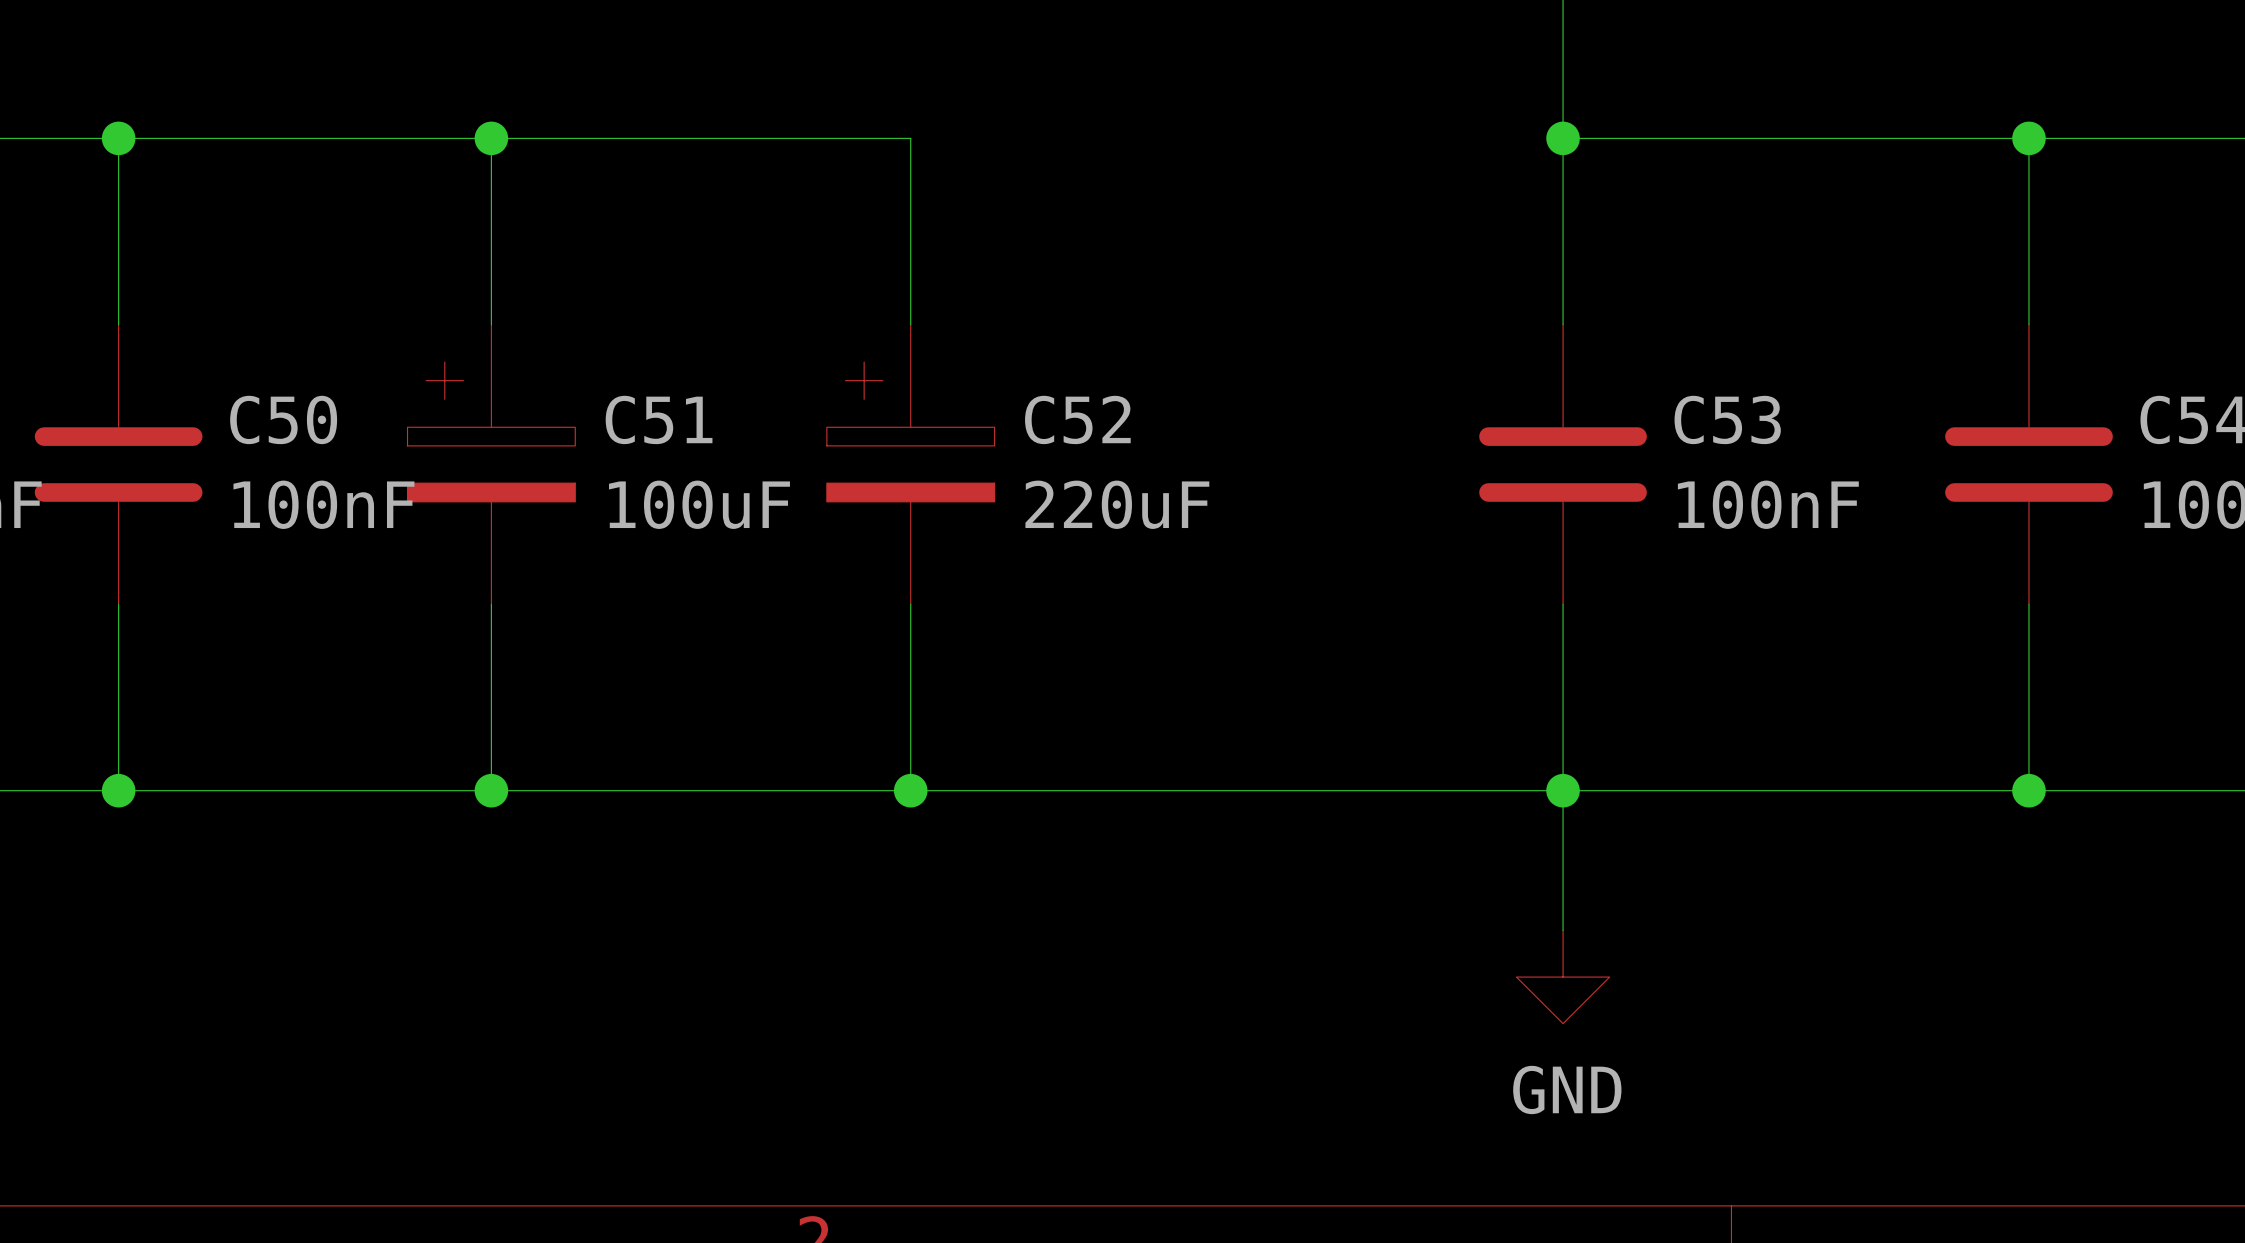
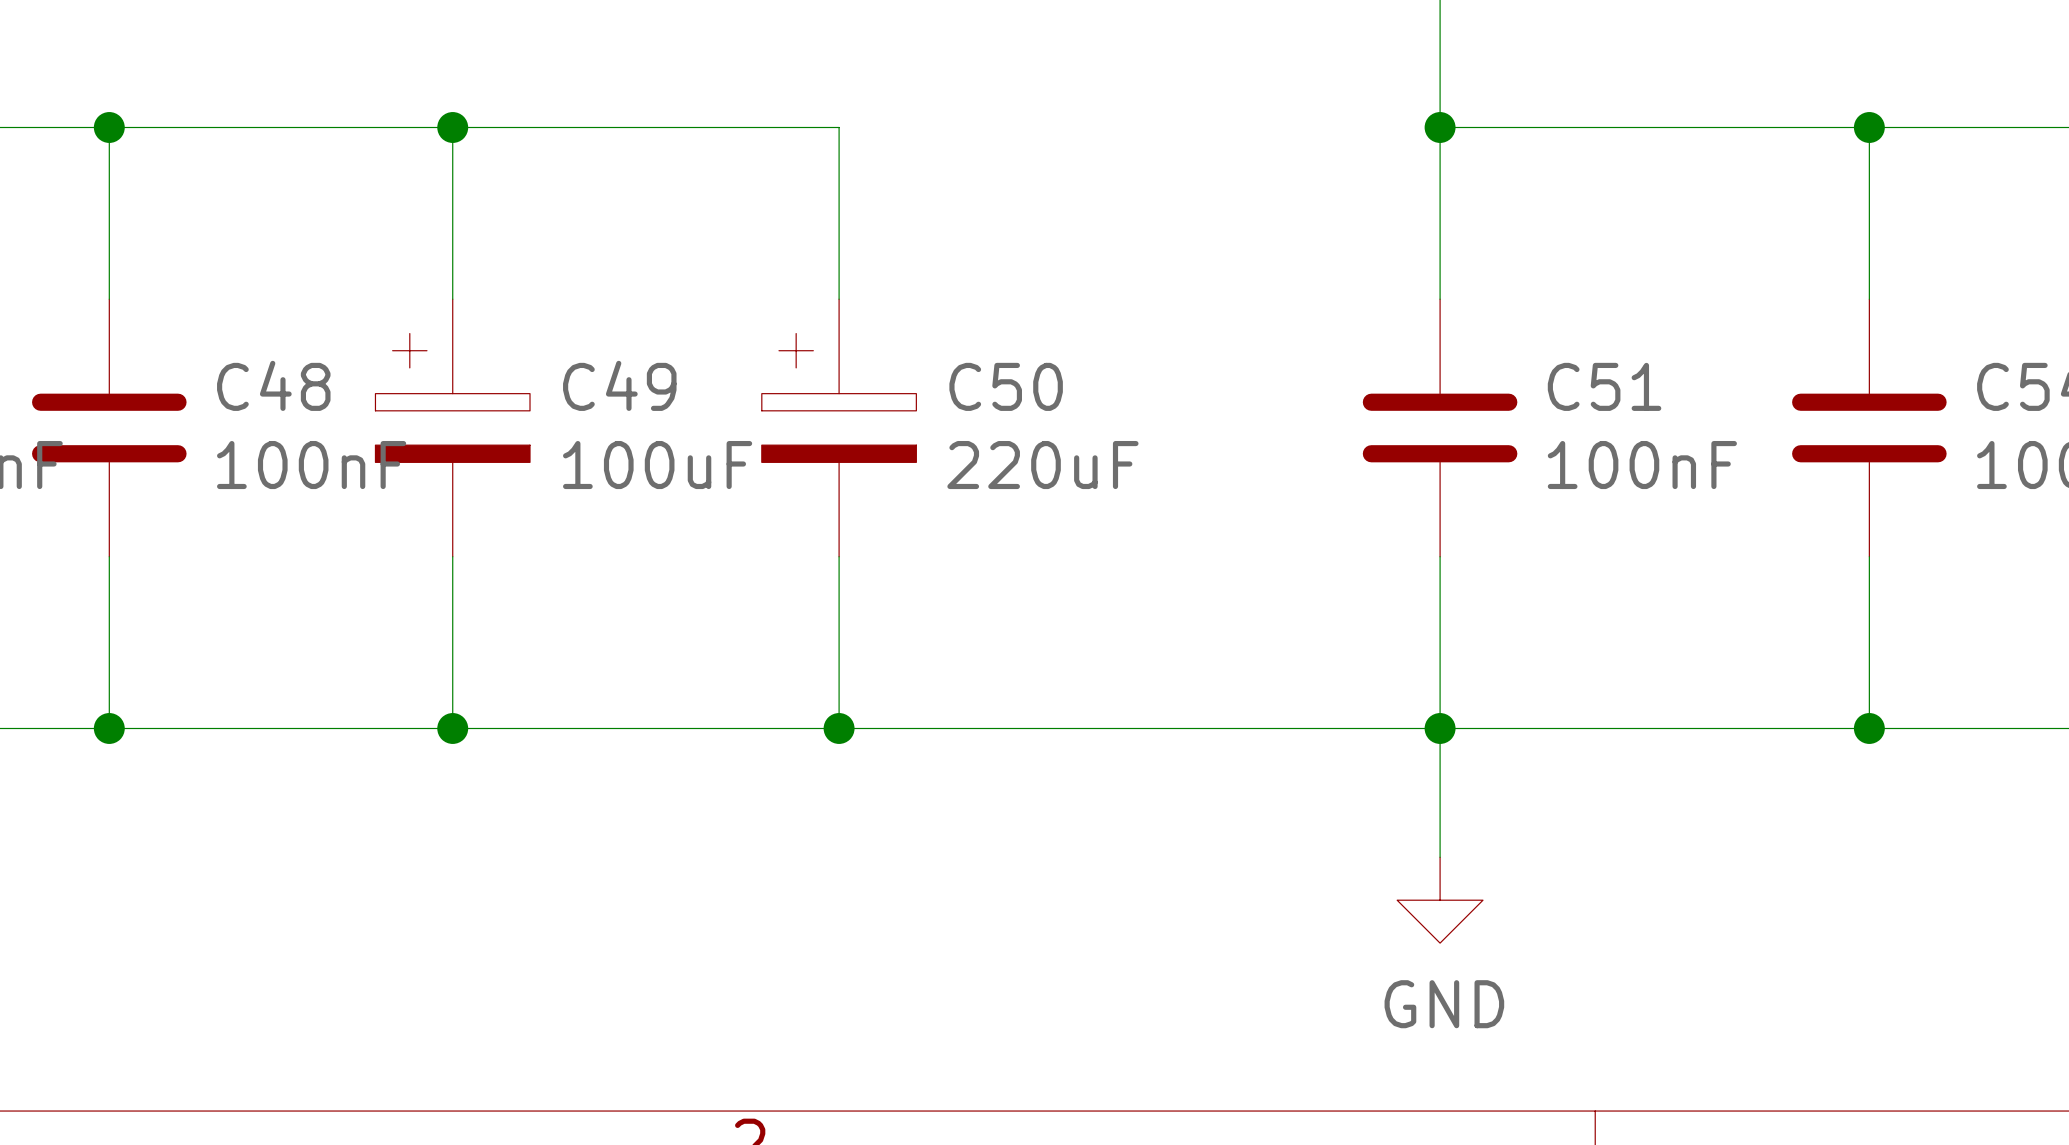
C50 name: C50 (283, 419) -> C48 (273, 385)
C51 name: C51 (659, 419) -> C49 (619, 385)
C52 name: C52 (1077, 419) -> C50 (1006, 386)
C53 name: C53 (1727, 419) -> C51 (1604, 386)

